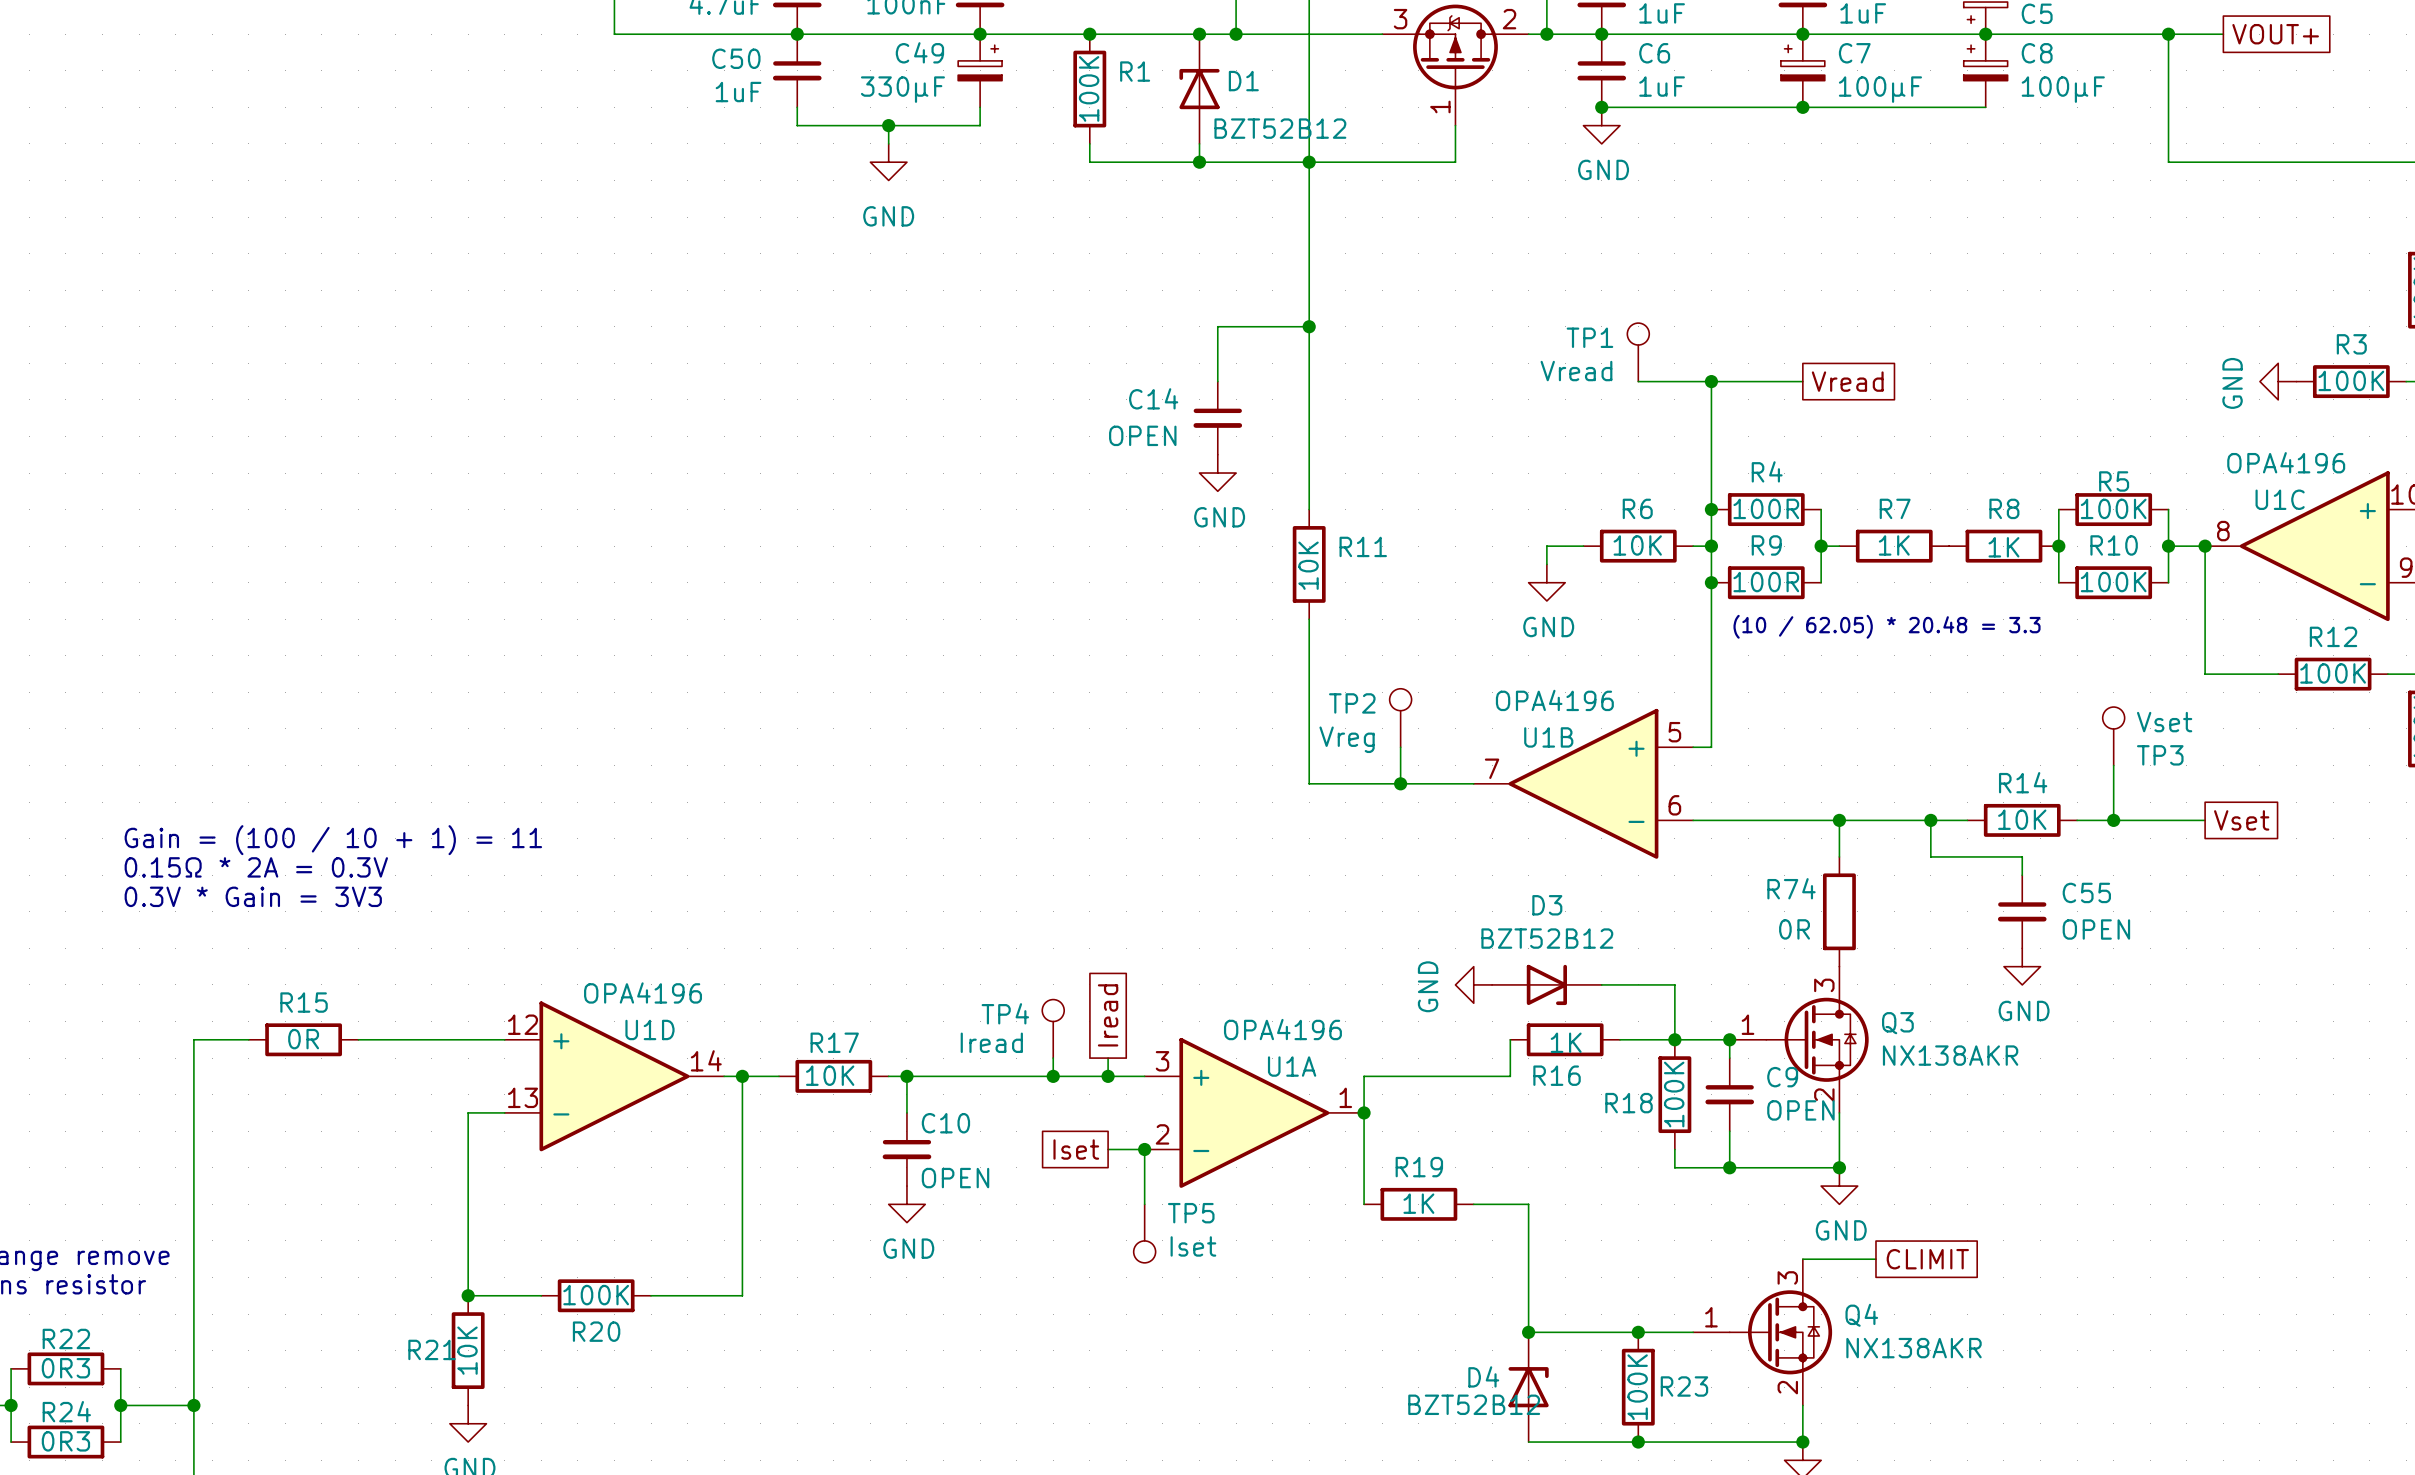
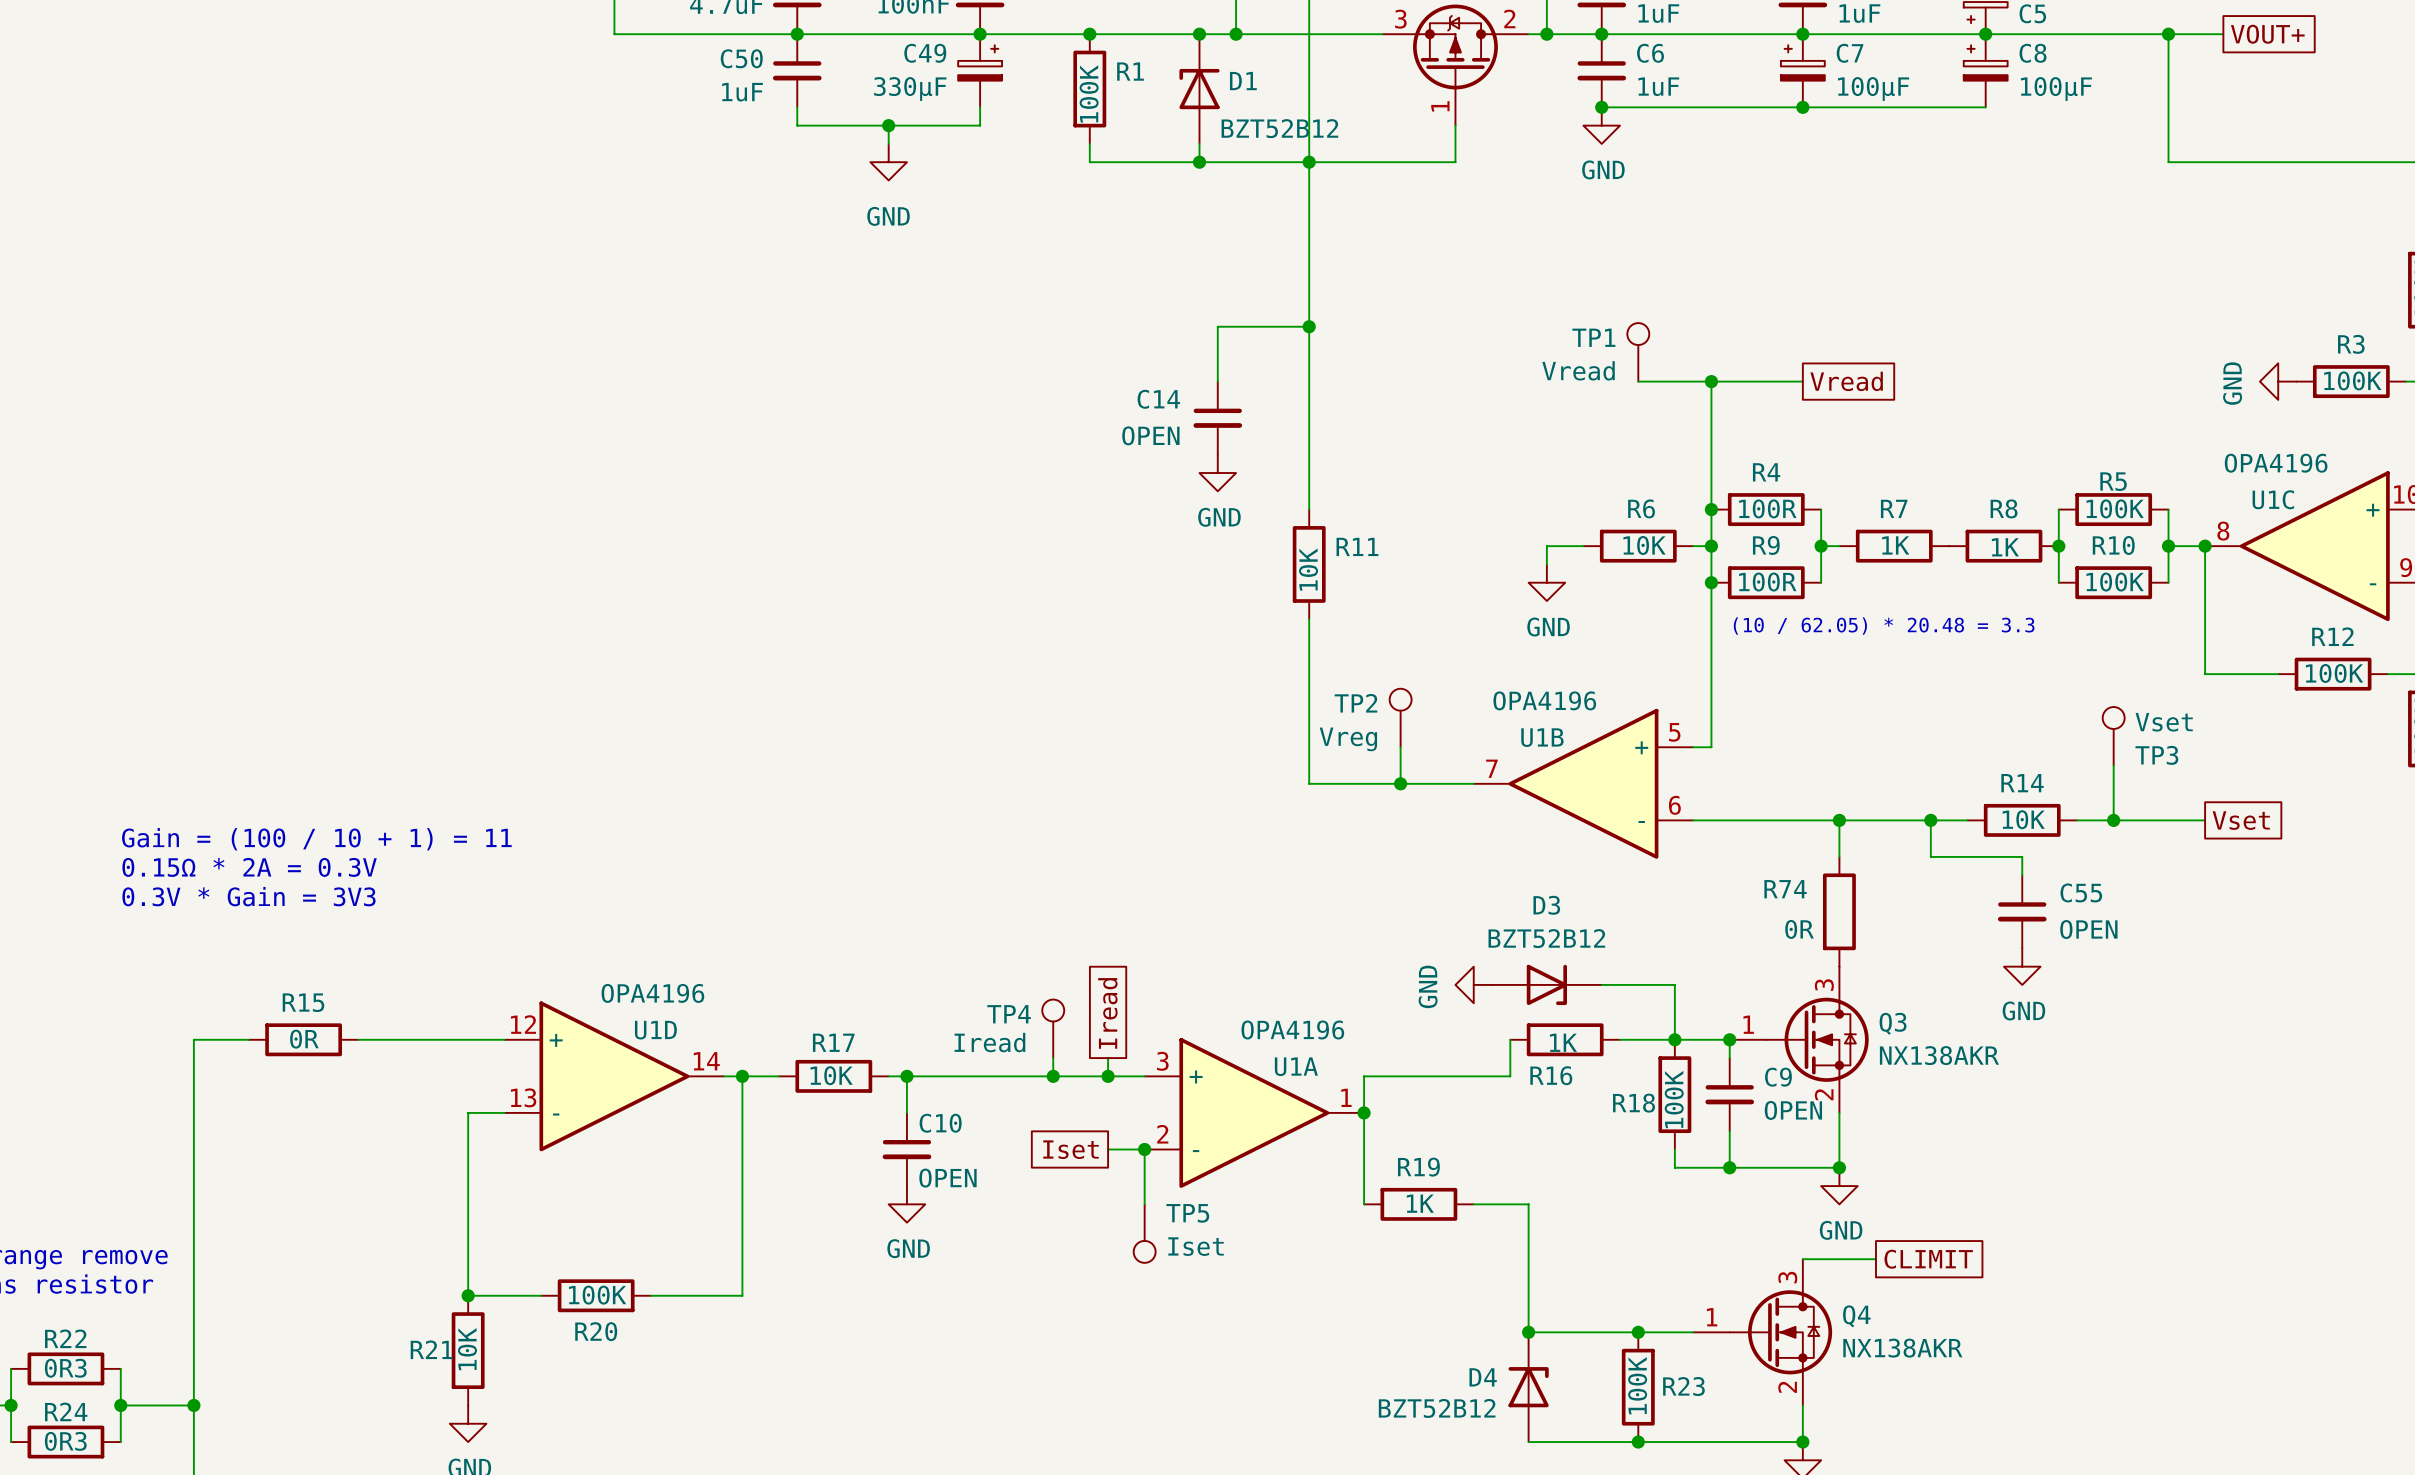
D4 value position: BZT52B12 (1474, 1404) -> BZT52B12 (1437, 1408)

